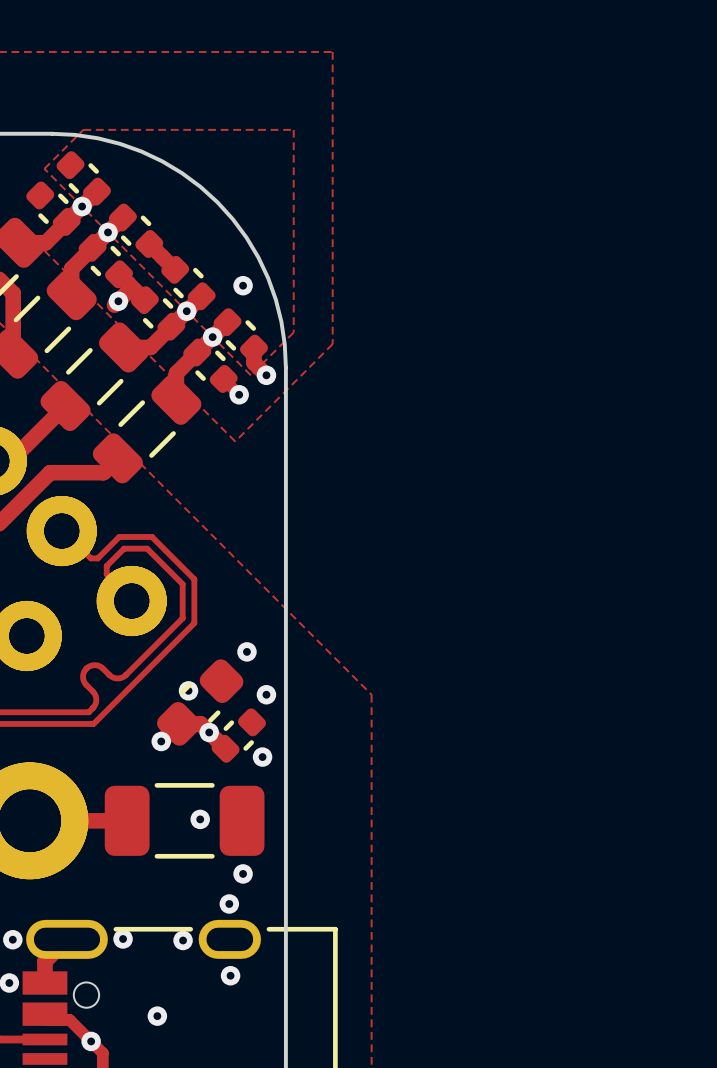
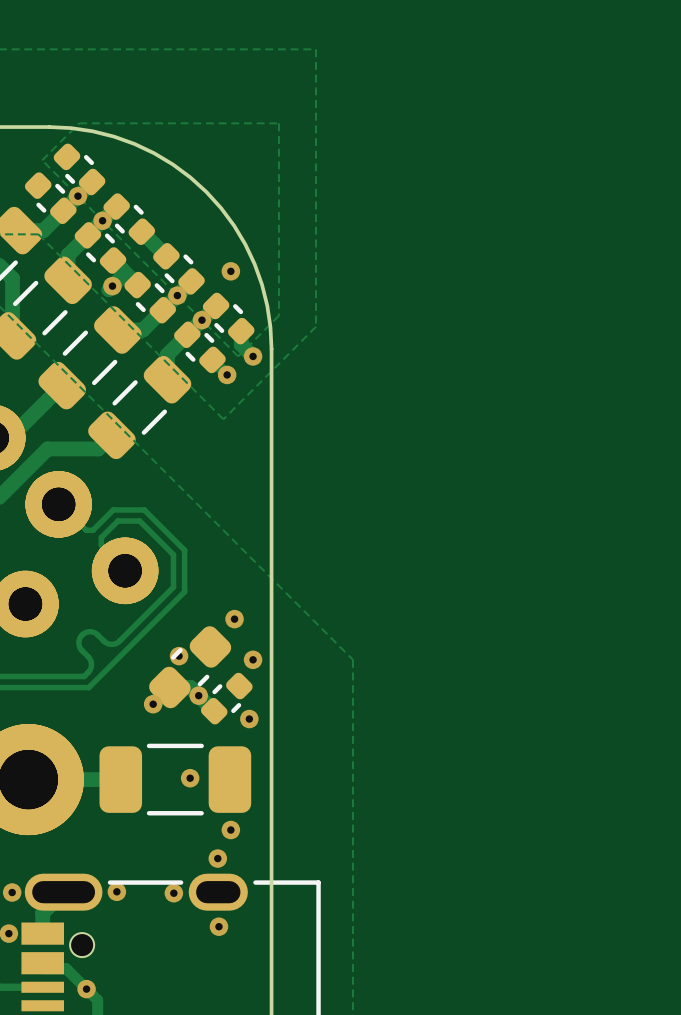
via: (157, 1016) -> none

